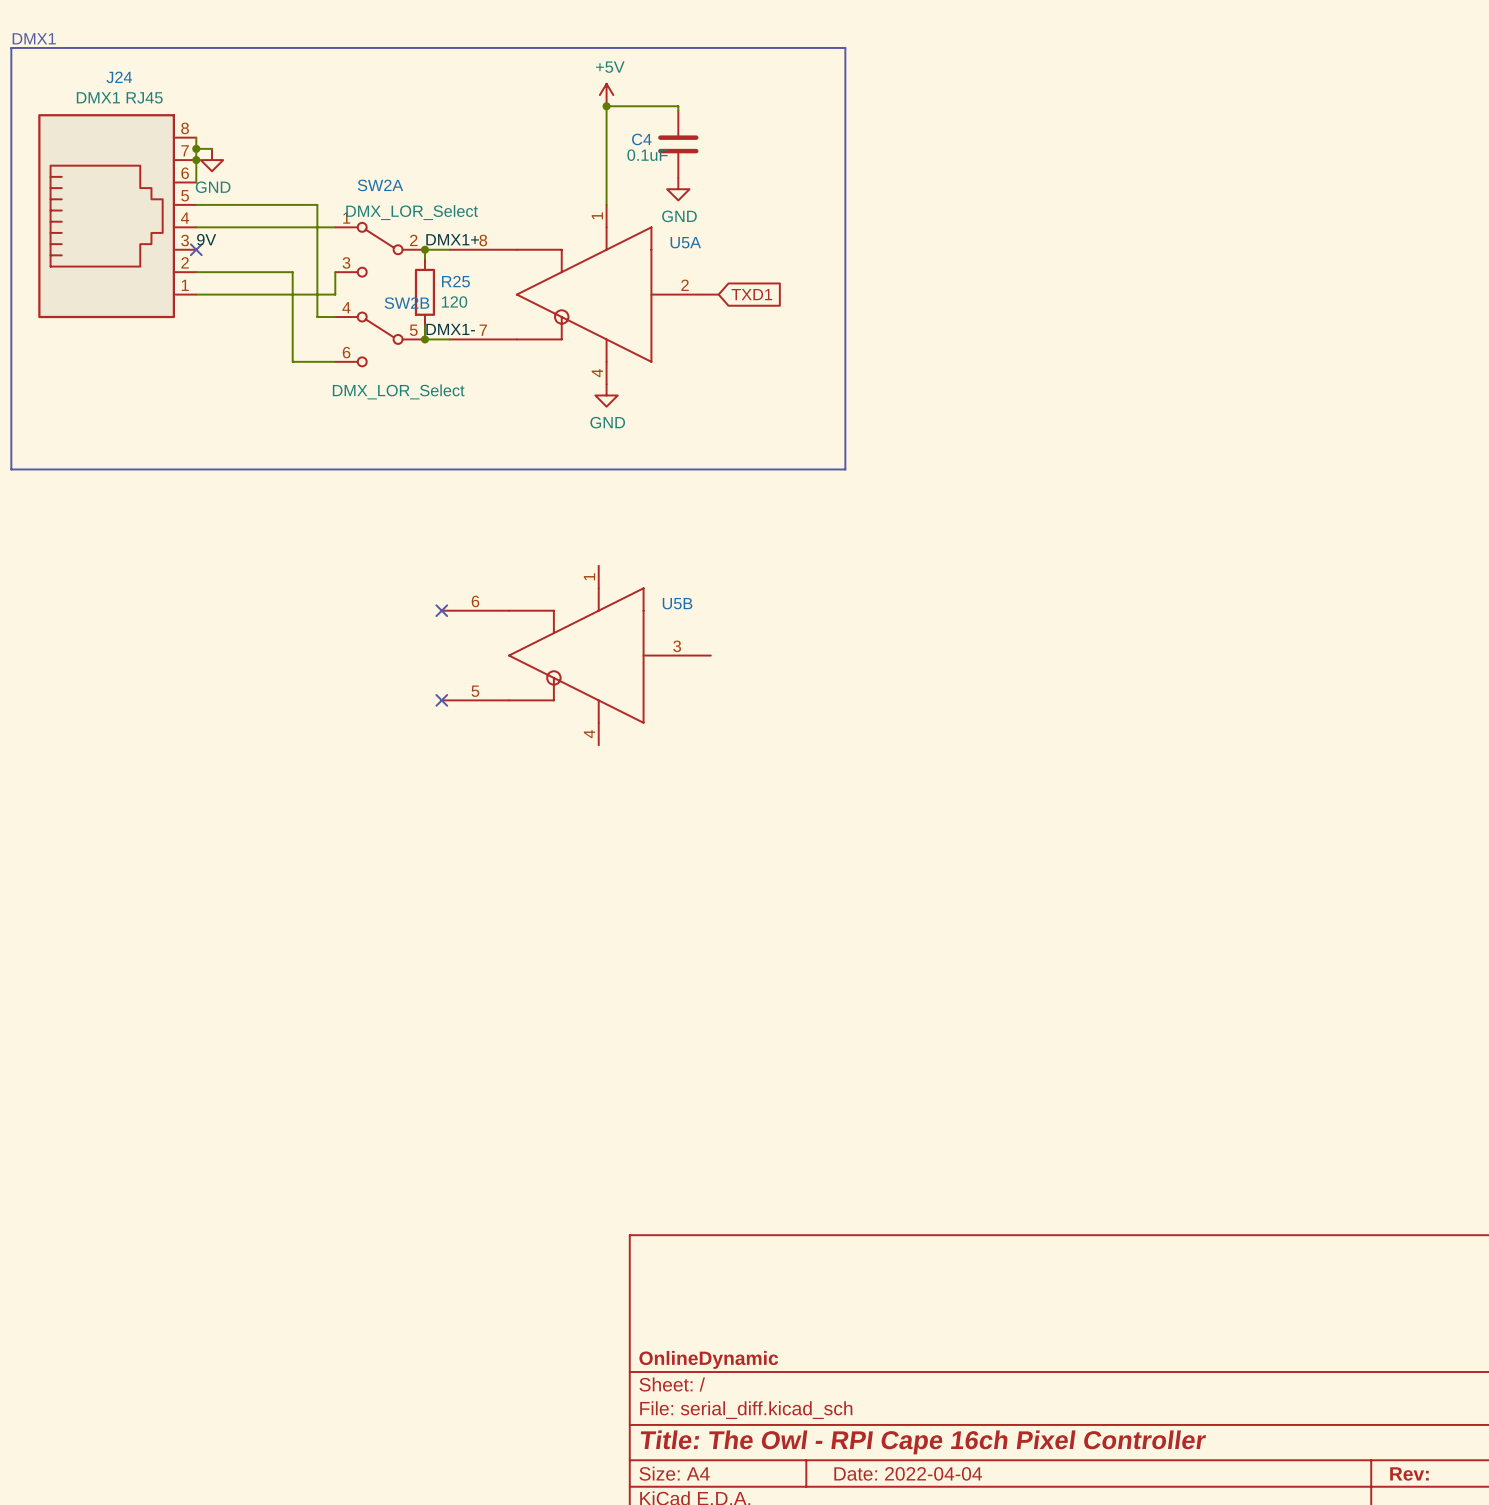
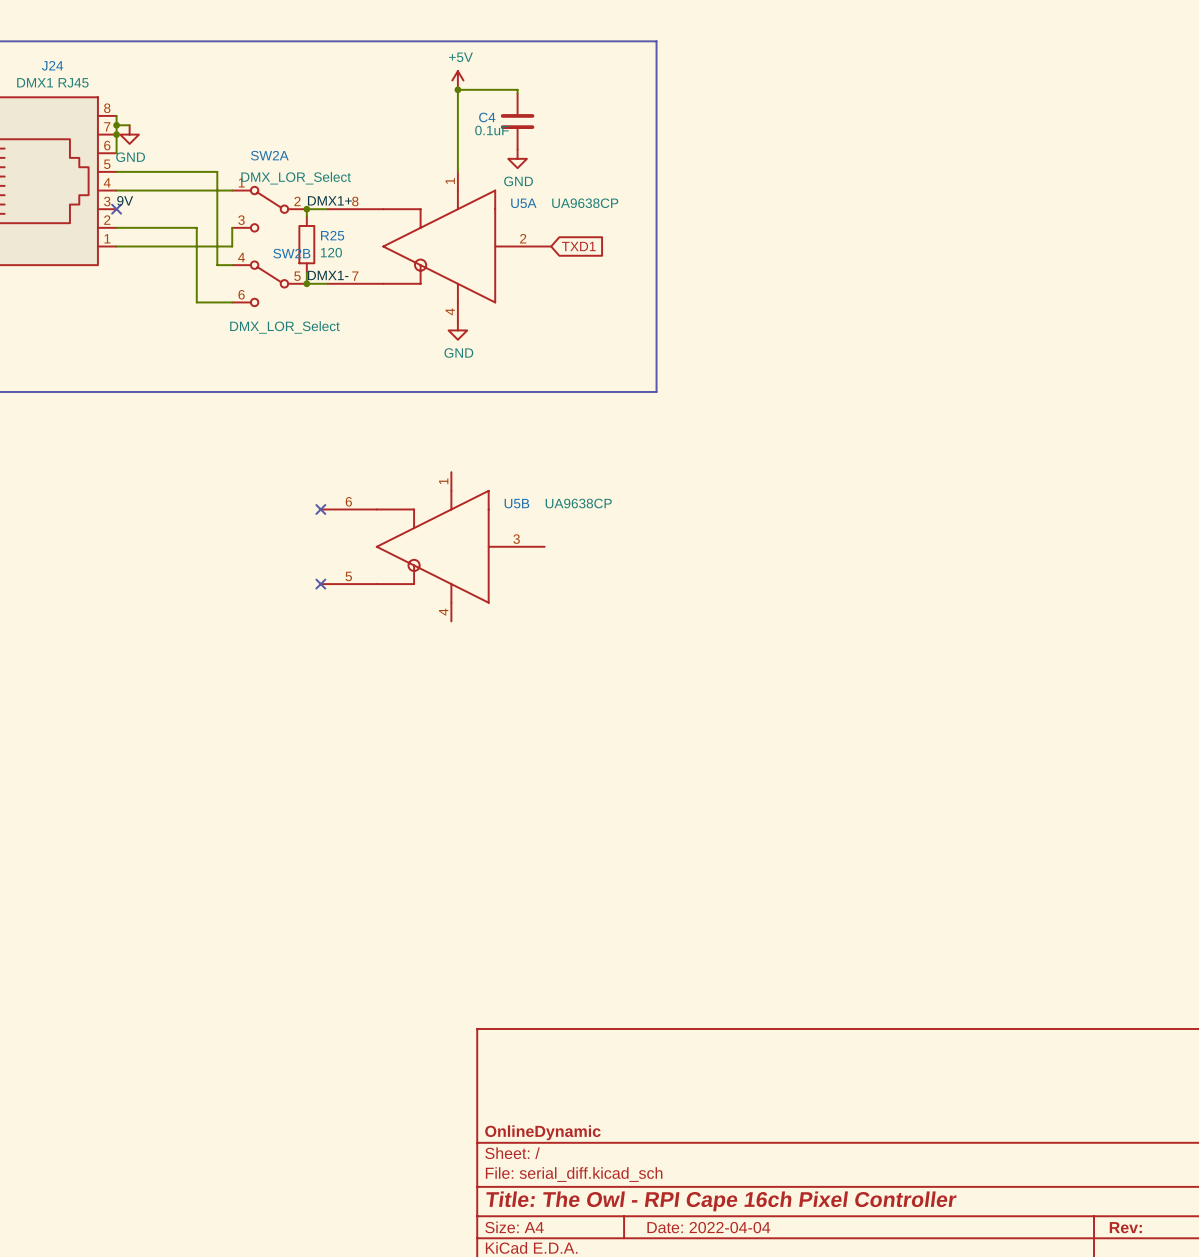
U5A value: none -> UA9638CP (585, 203)
U5B value: none -> UA9638CP (578, 503)

